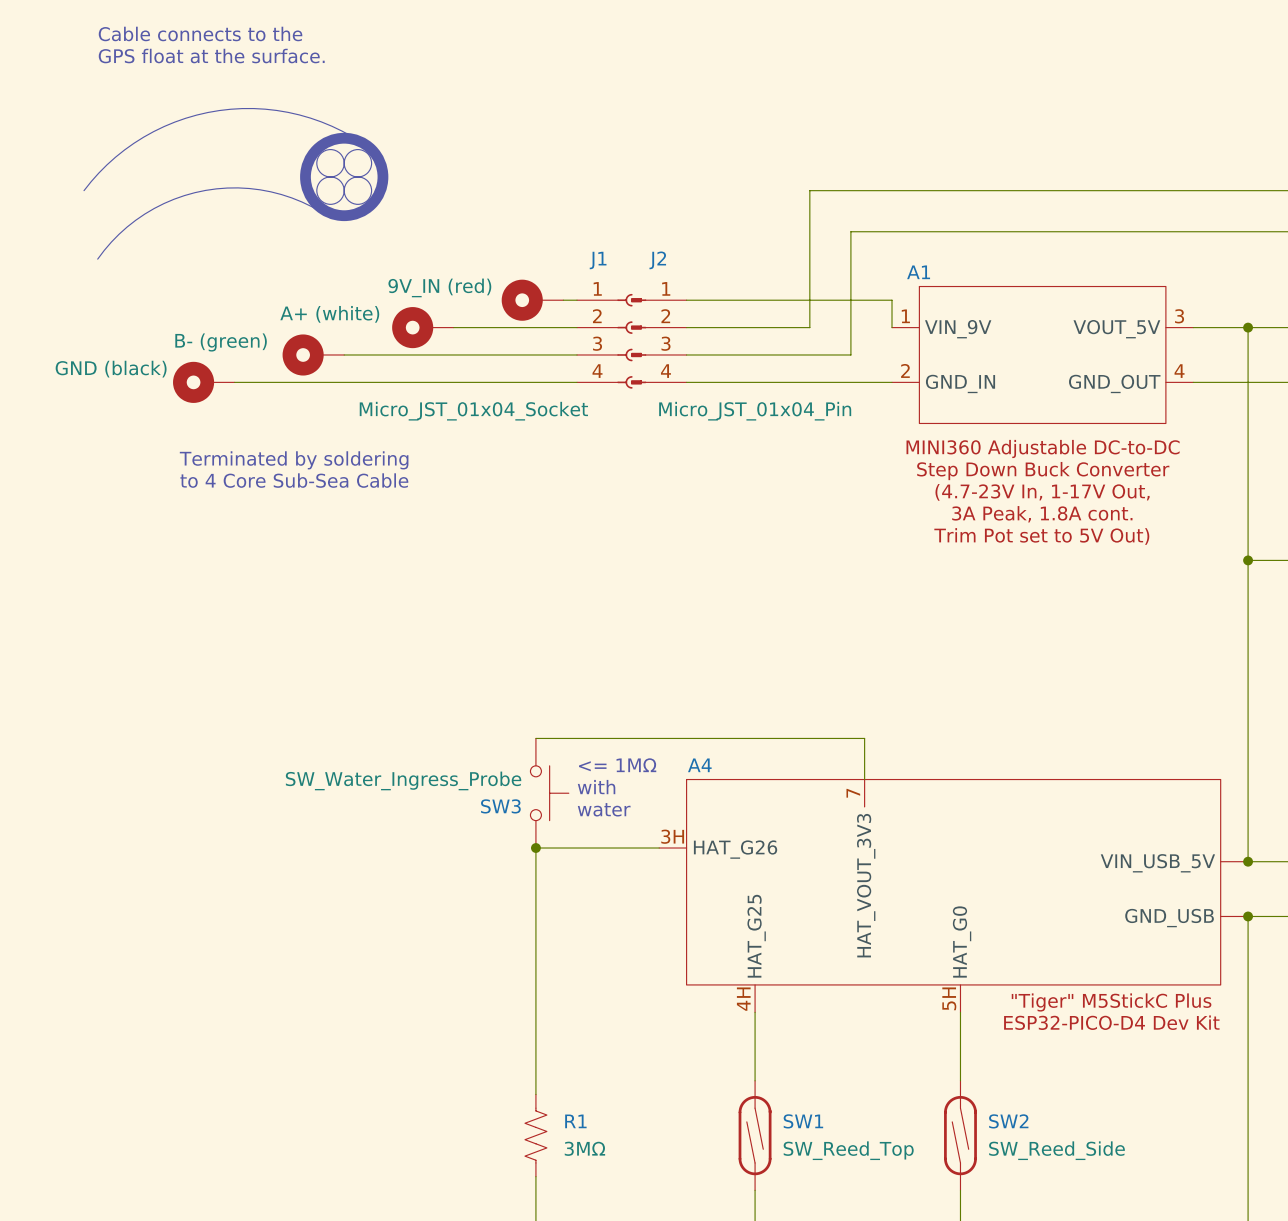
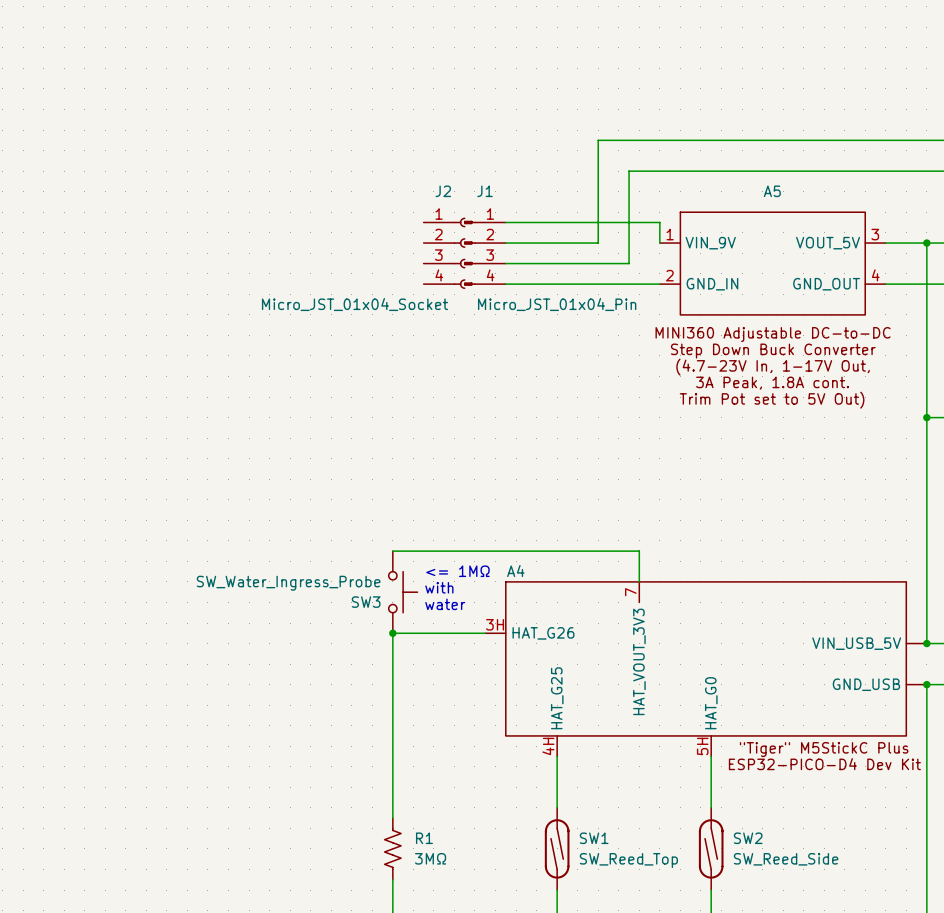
text: Cable connects to the (200, 33) -> none
text: GPS float at the surface. (211, 56) -> none
drawing: [300, 132, 389, 222] -> none
line: (371, 149) (342, 131) (299, 114) (265, 109) (219, 110) (185, 118) (143, 137) (106, 164) (84, 190) -> none
line: (330, 218) (301, 201) (270, 191) (238, 187) (205, 190) (174, 199) (144, 214) (119, 234) (97, 259) -> none
J1 name: J1 (598, 260) -> J2 (443, 191)
J2 name: J2 (657, 260) -> J1 (485, 191)
A1 name: A1 (918, 272) -> A5 (772, 191)
part: 9V_IN (red) (532, 300) -> none
wire: (563, 300) (577, 300) -> none
part: A+ (white) (422, 327) -> none
wire: (453, 327) (577, 327) -> none
part: B- (green) (313, 354) -> none
wire: (344, 354) (577, 354) -> none
part: GND (black) (203, 382) -> none
wire: (234, 382) (577, 382) -> none
text: Terminated by soldering (294, 460) -> none
text: to 4 Core Sub-Sea Cable (294, 480) -> none

